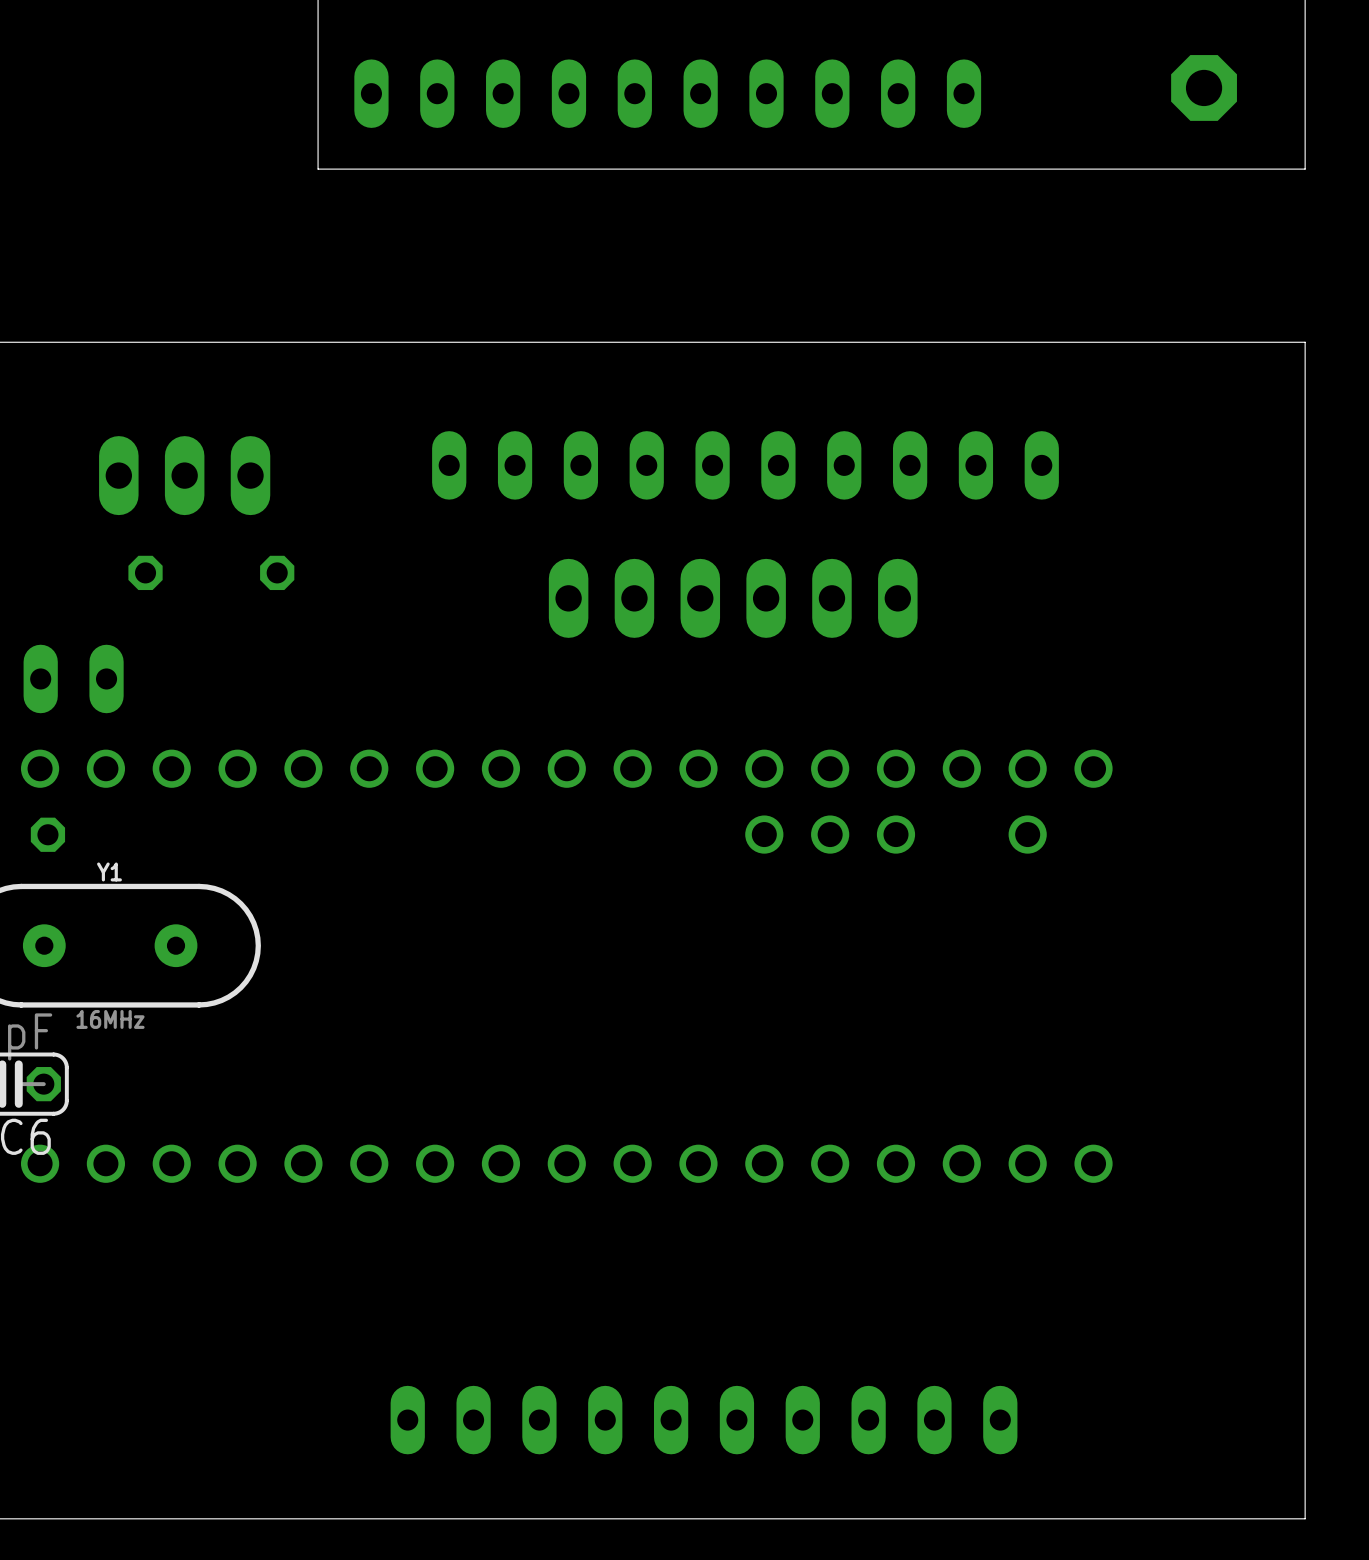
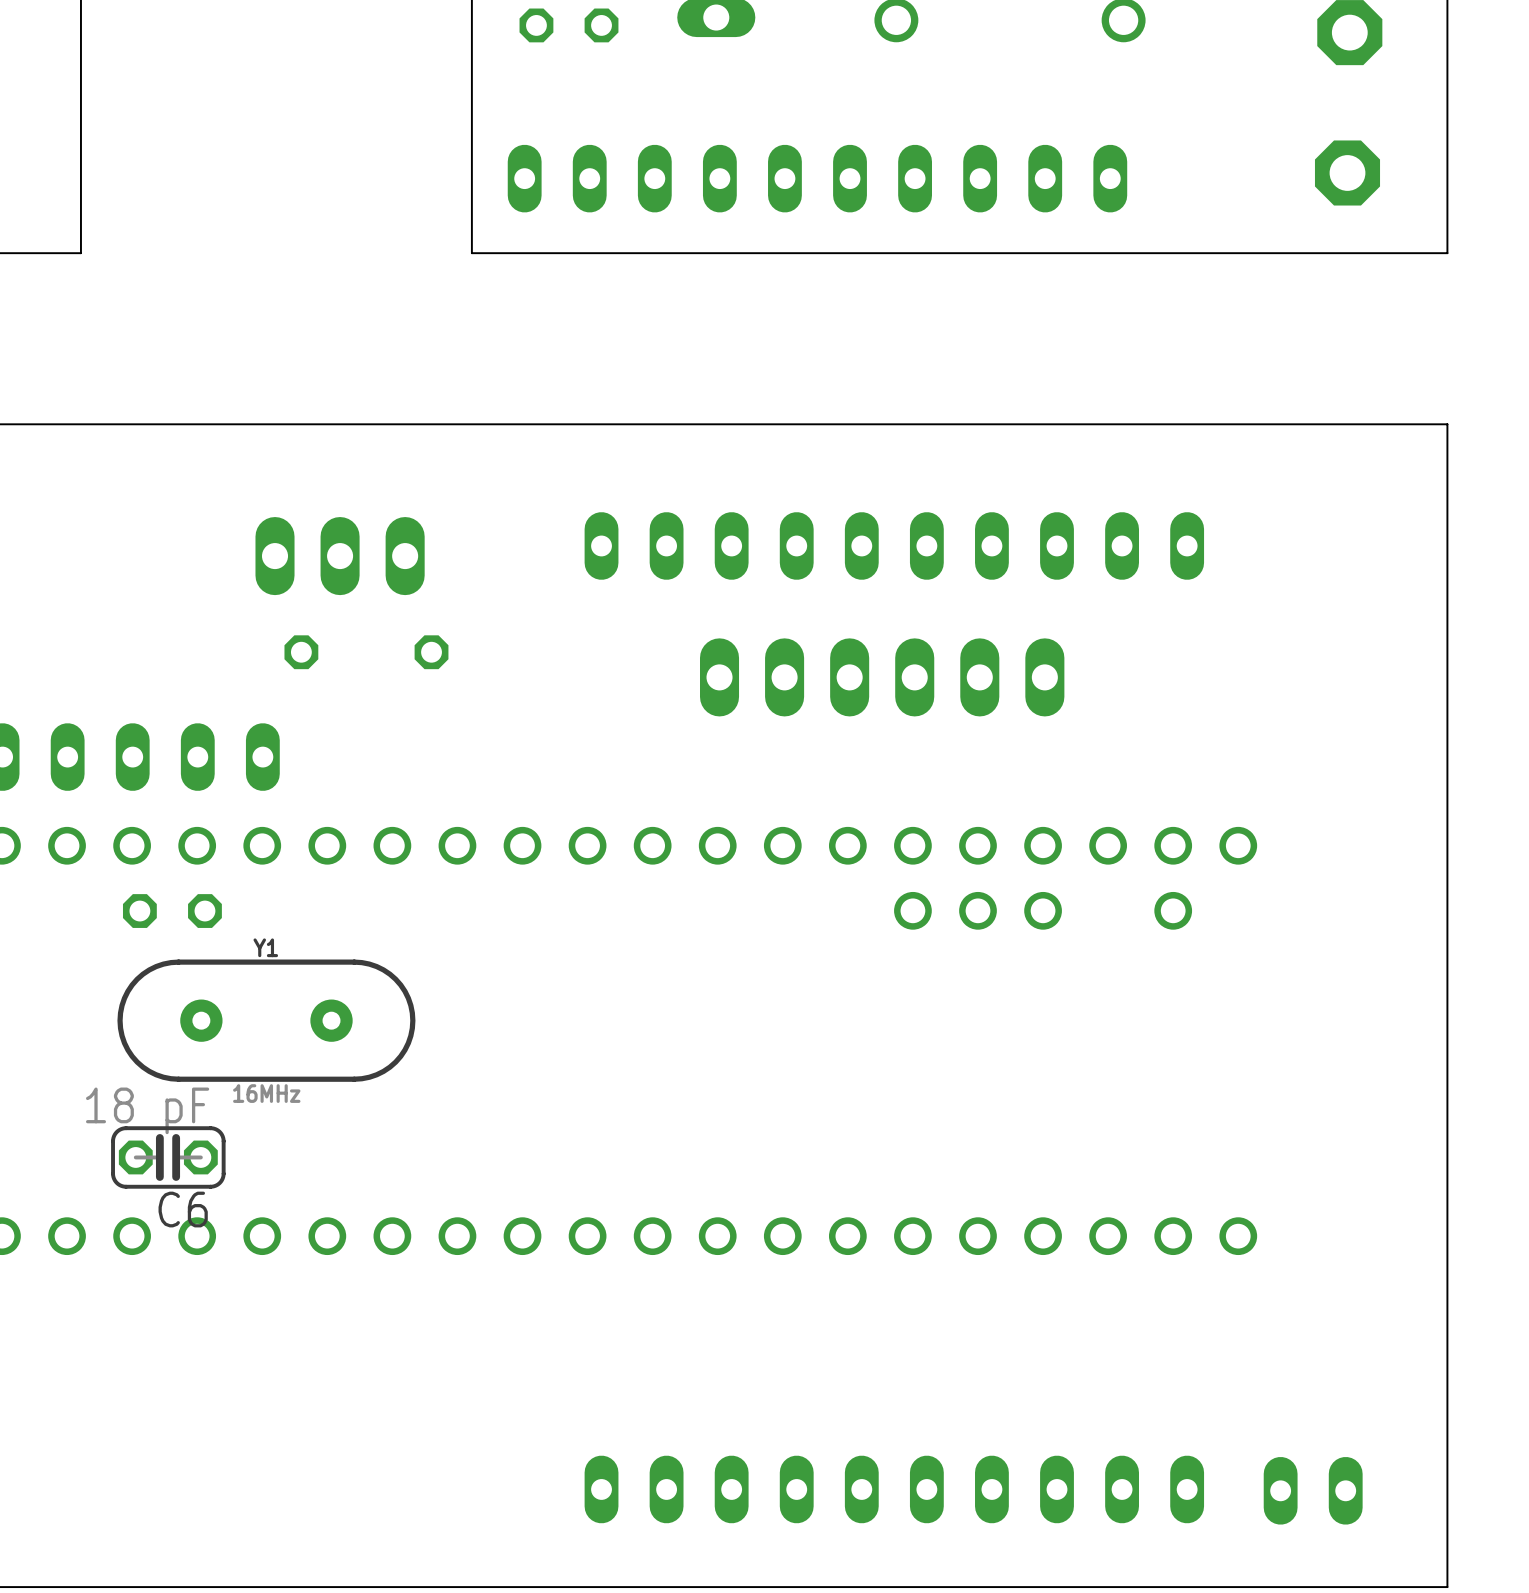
part position: (704, 1420) -> (894, 1489)
part: none -> (1313, 1490)

